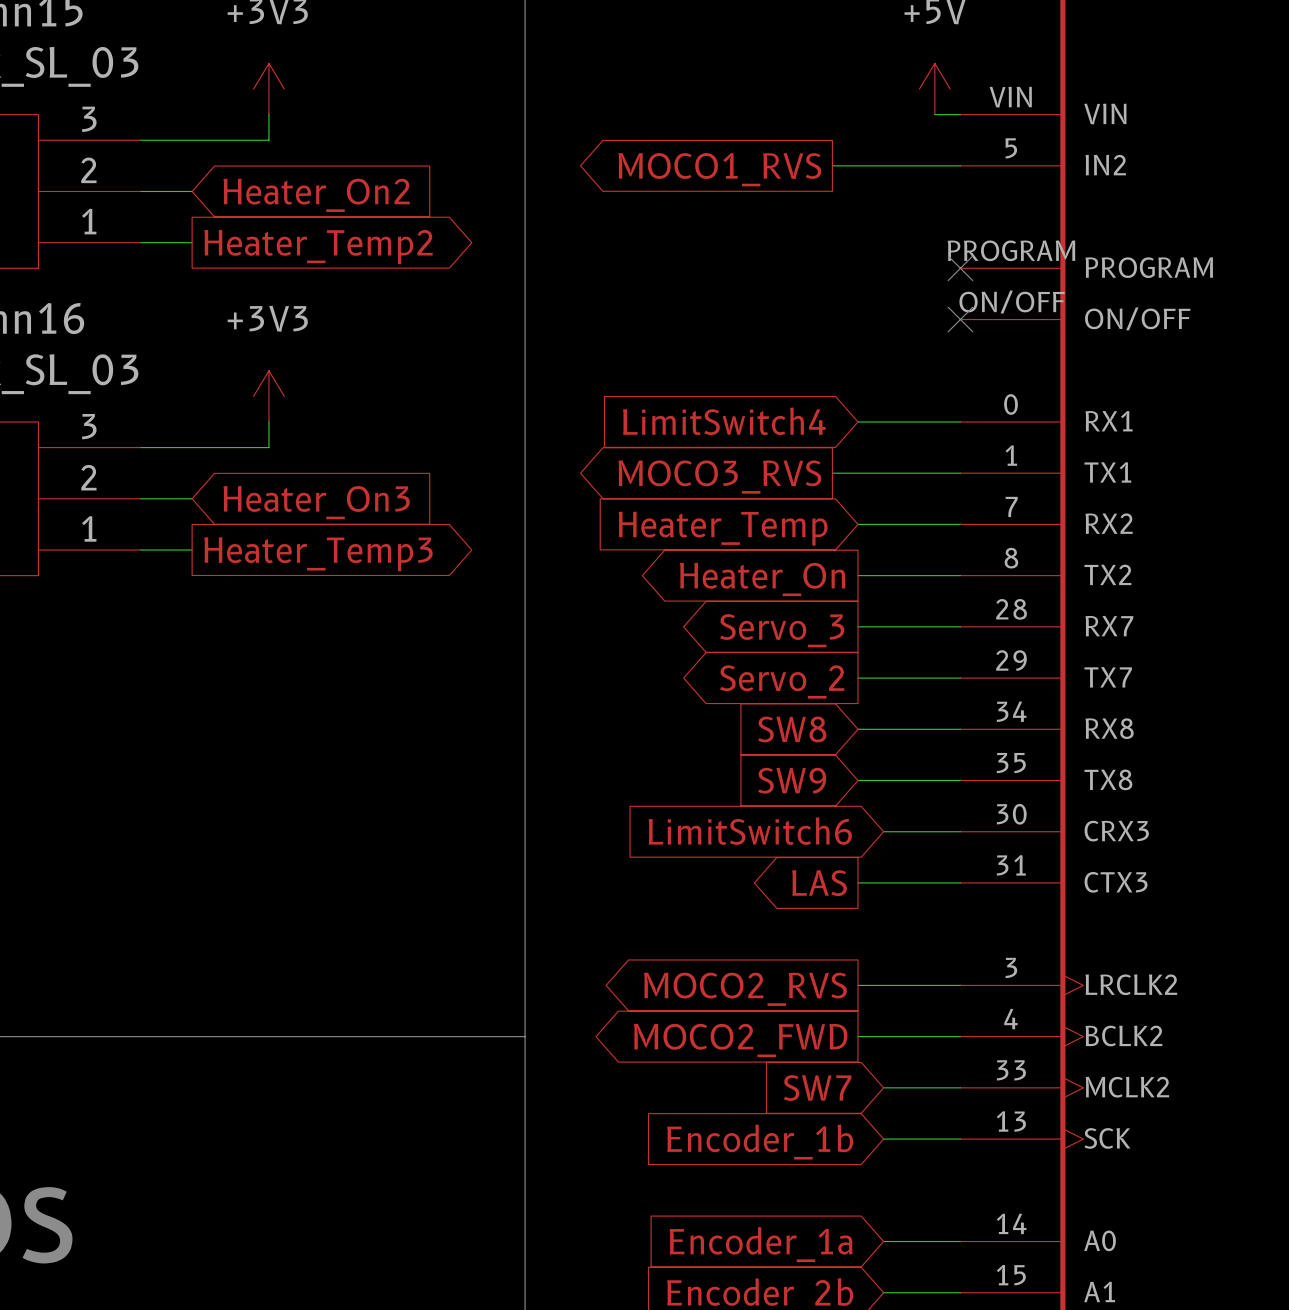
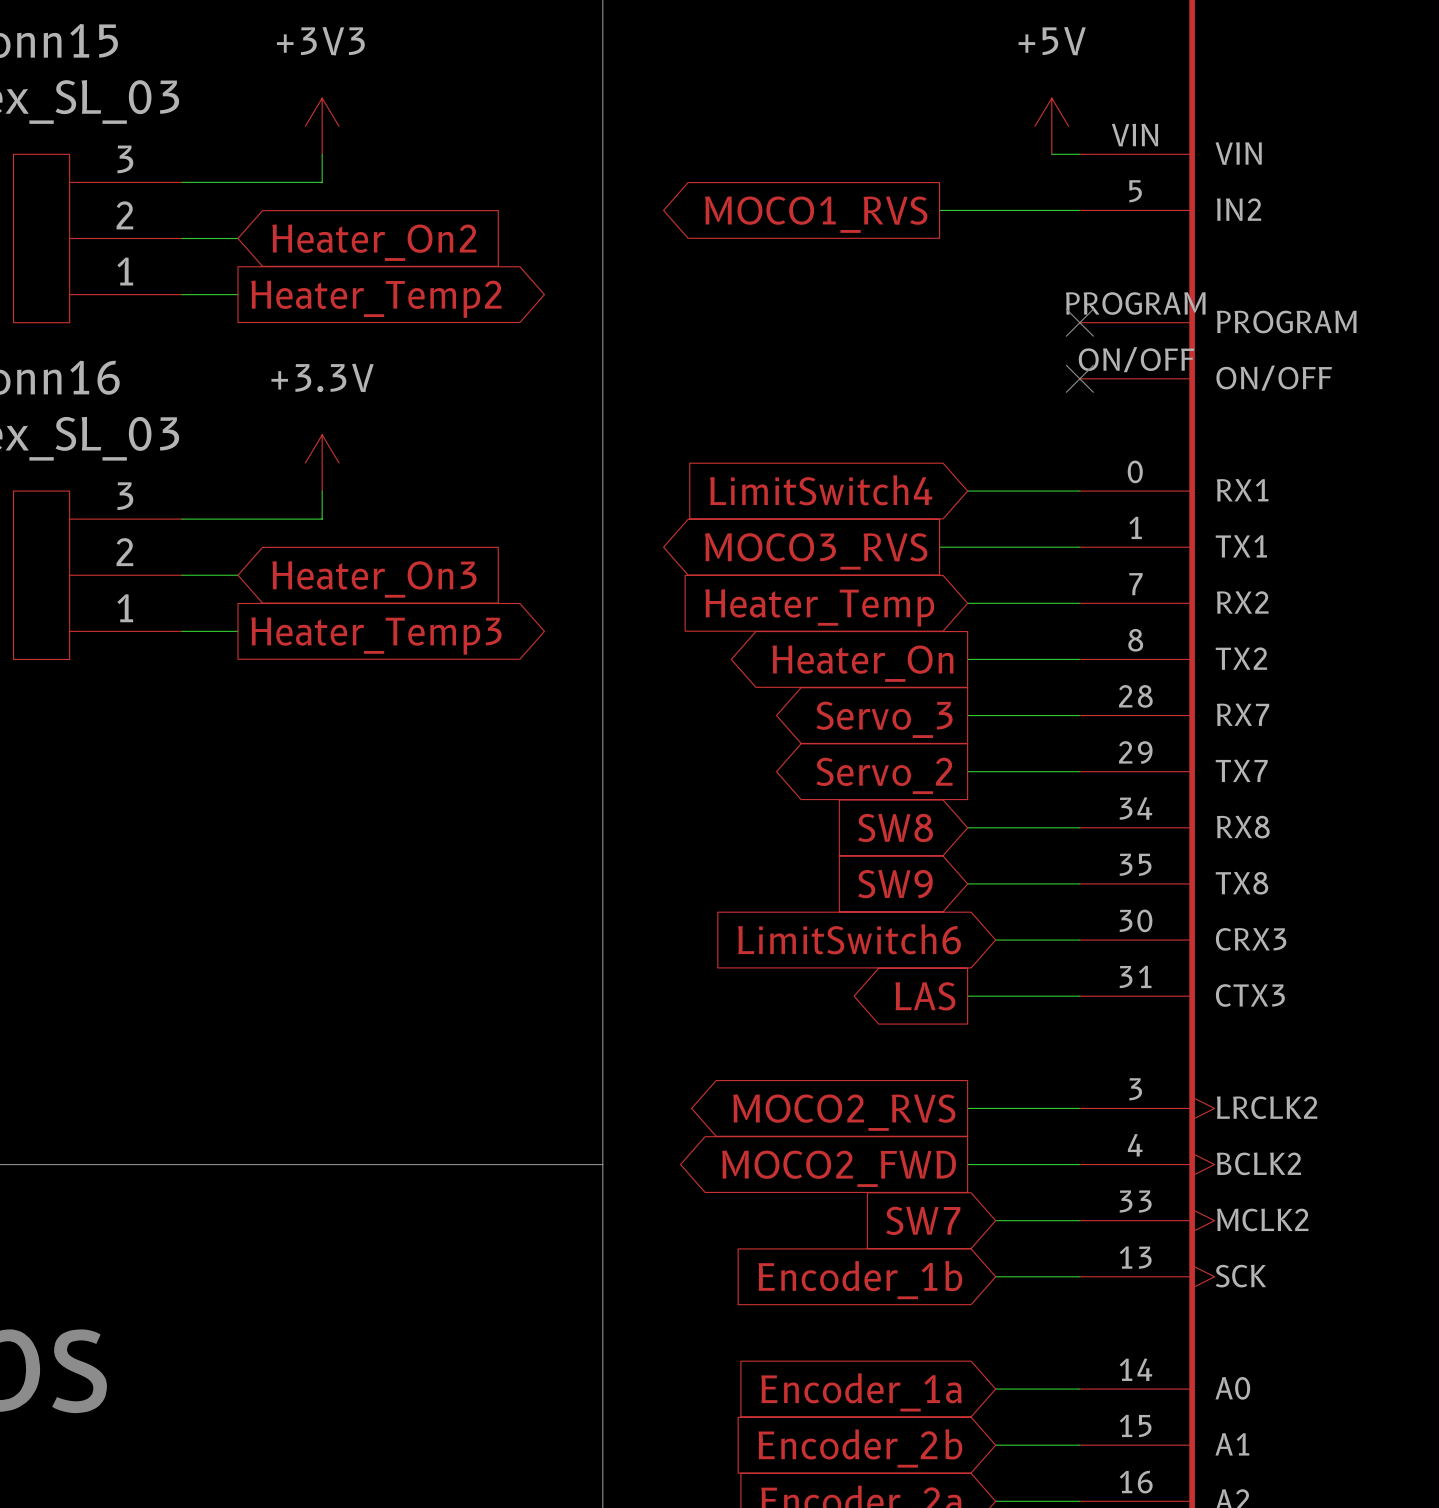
power symbol: +3V3 (268, 396) -> +3.3V (322, 463)

